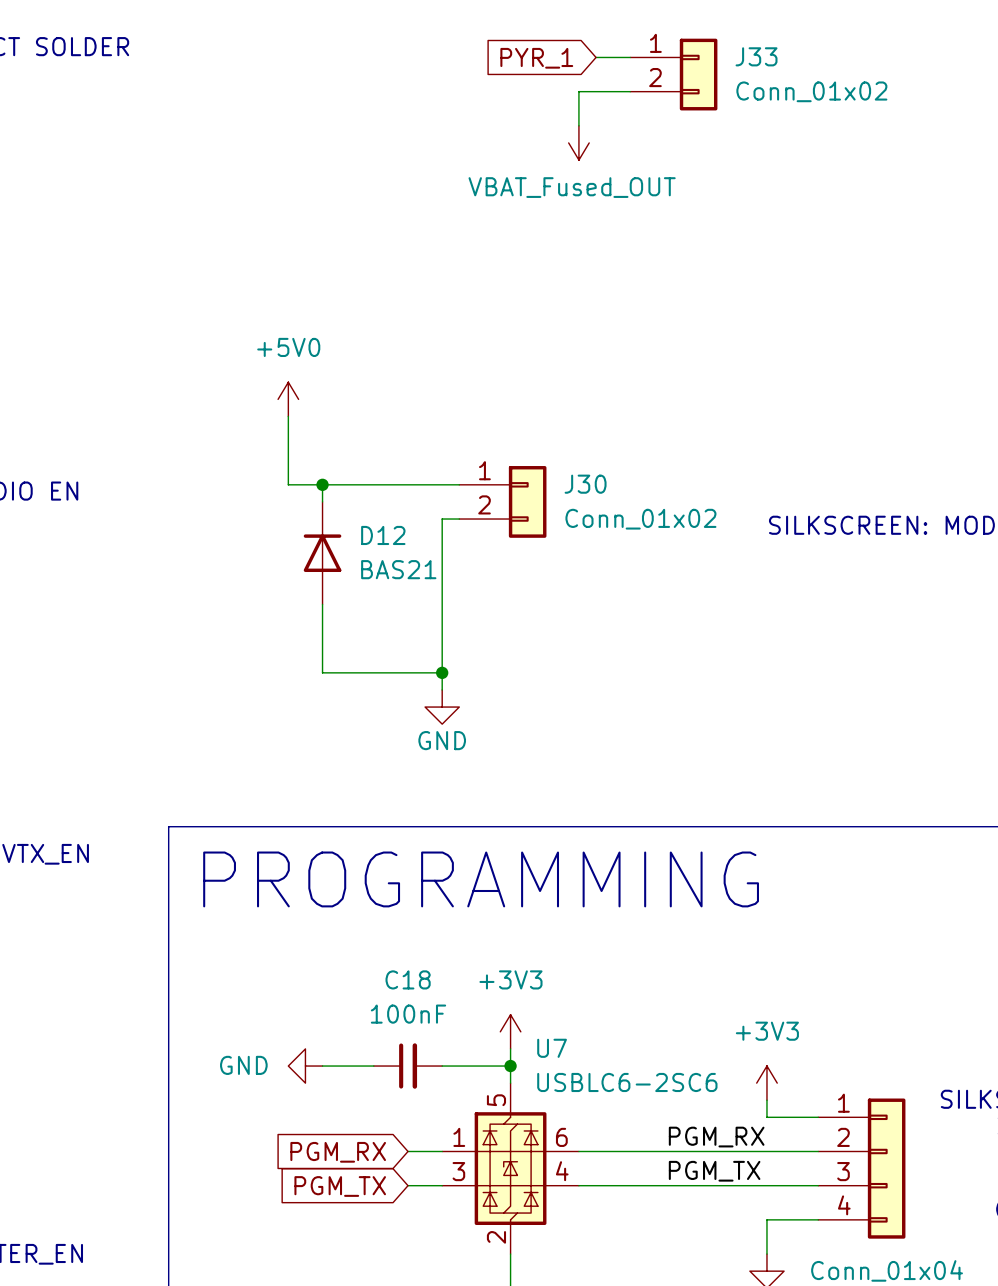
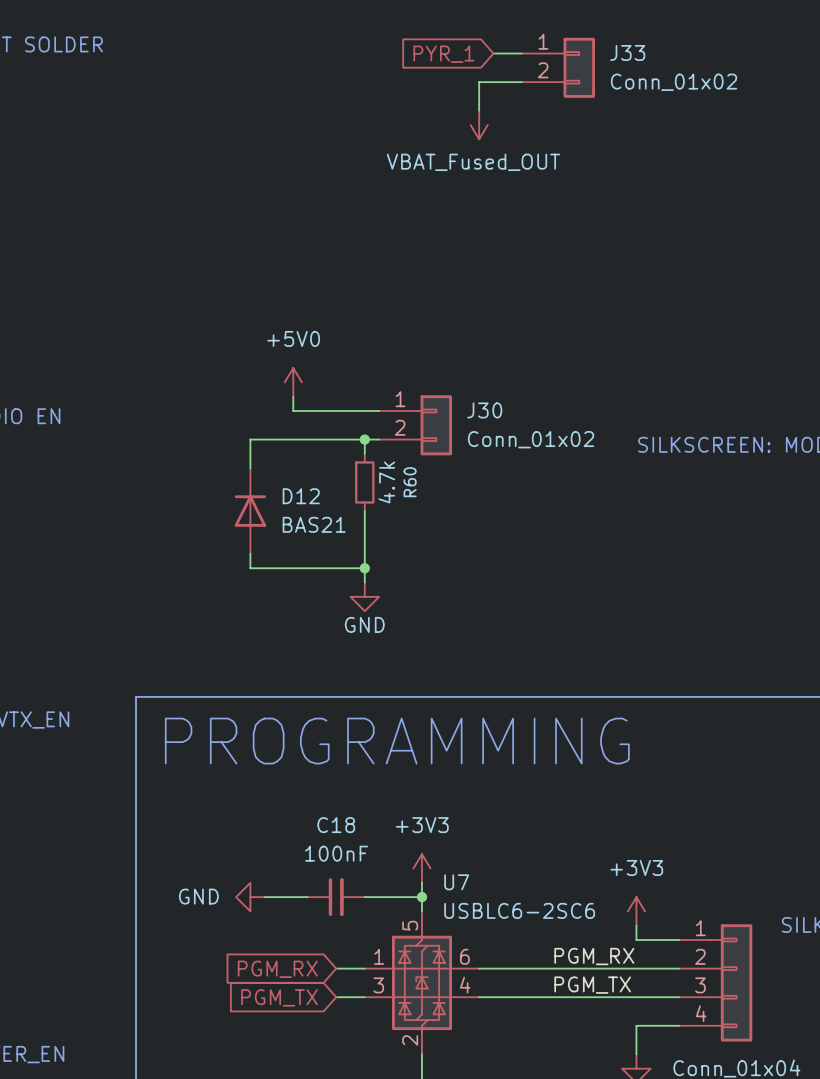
power symbol position: +5V0 (288, 399) -> +5V0 (293, 382)
wire: (288, 416) (288, 484) (356, 484) -> (293, 396) (293, 410)
wire: (322, 484) (322, 501) -> none
junction: (322, 484) -> none
wire: none -> (364, 439) (250, 439) (250, 468)
junction: none -> (364, 439)
wire: (442, 536) (442, 604) -> none
D12 position: (322, 553) -> (250, 511)
R60: none -> 4.7k (364, 482)
wire: (322, 604) (322, 672) -> (250, 553) (250, 568) (264, 568)

